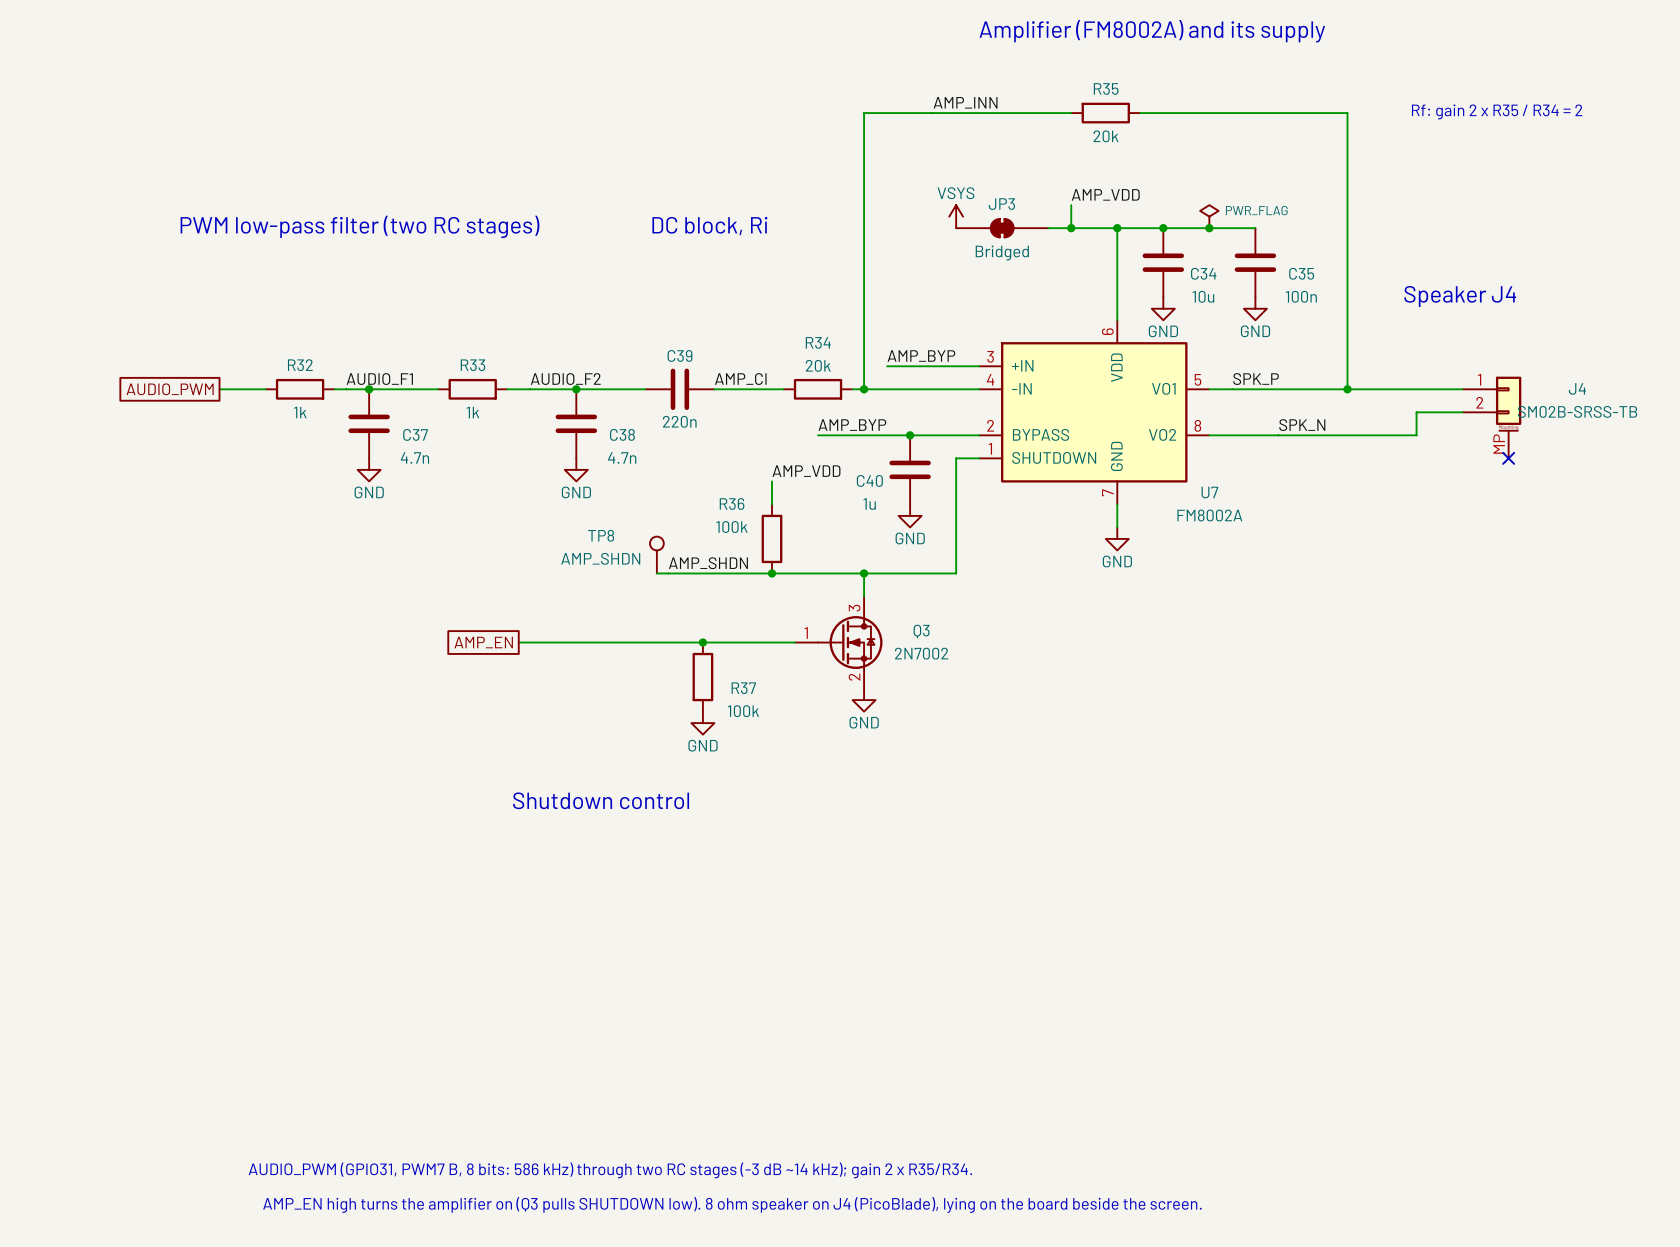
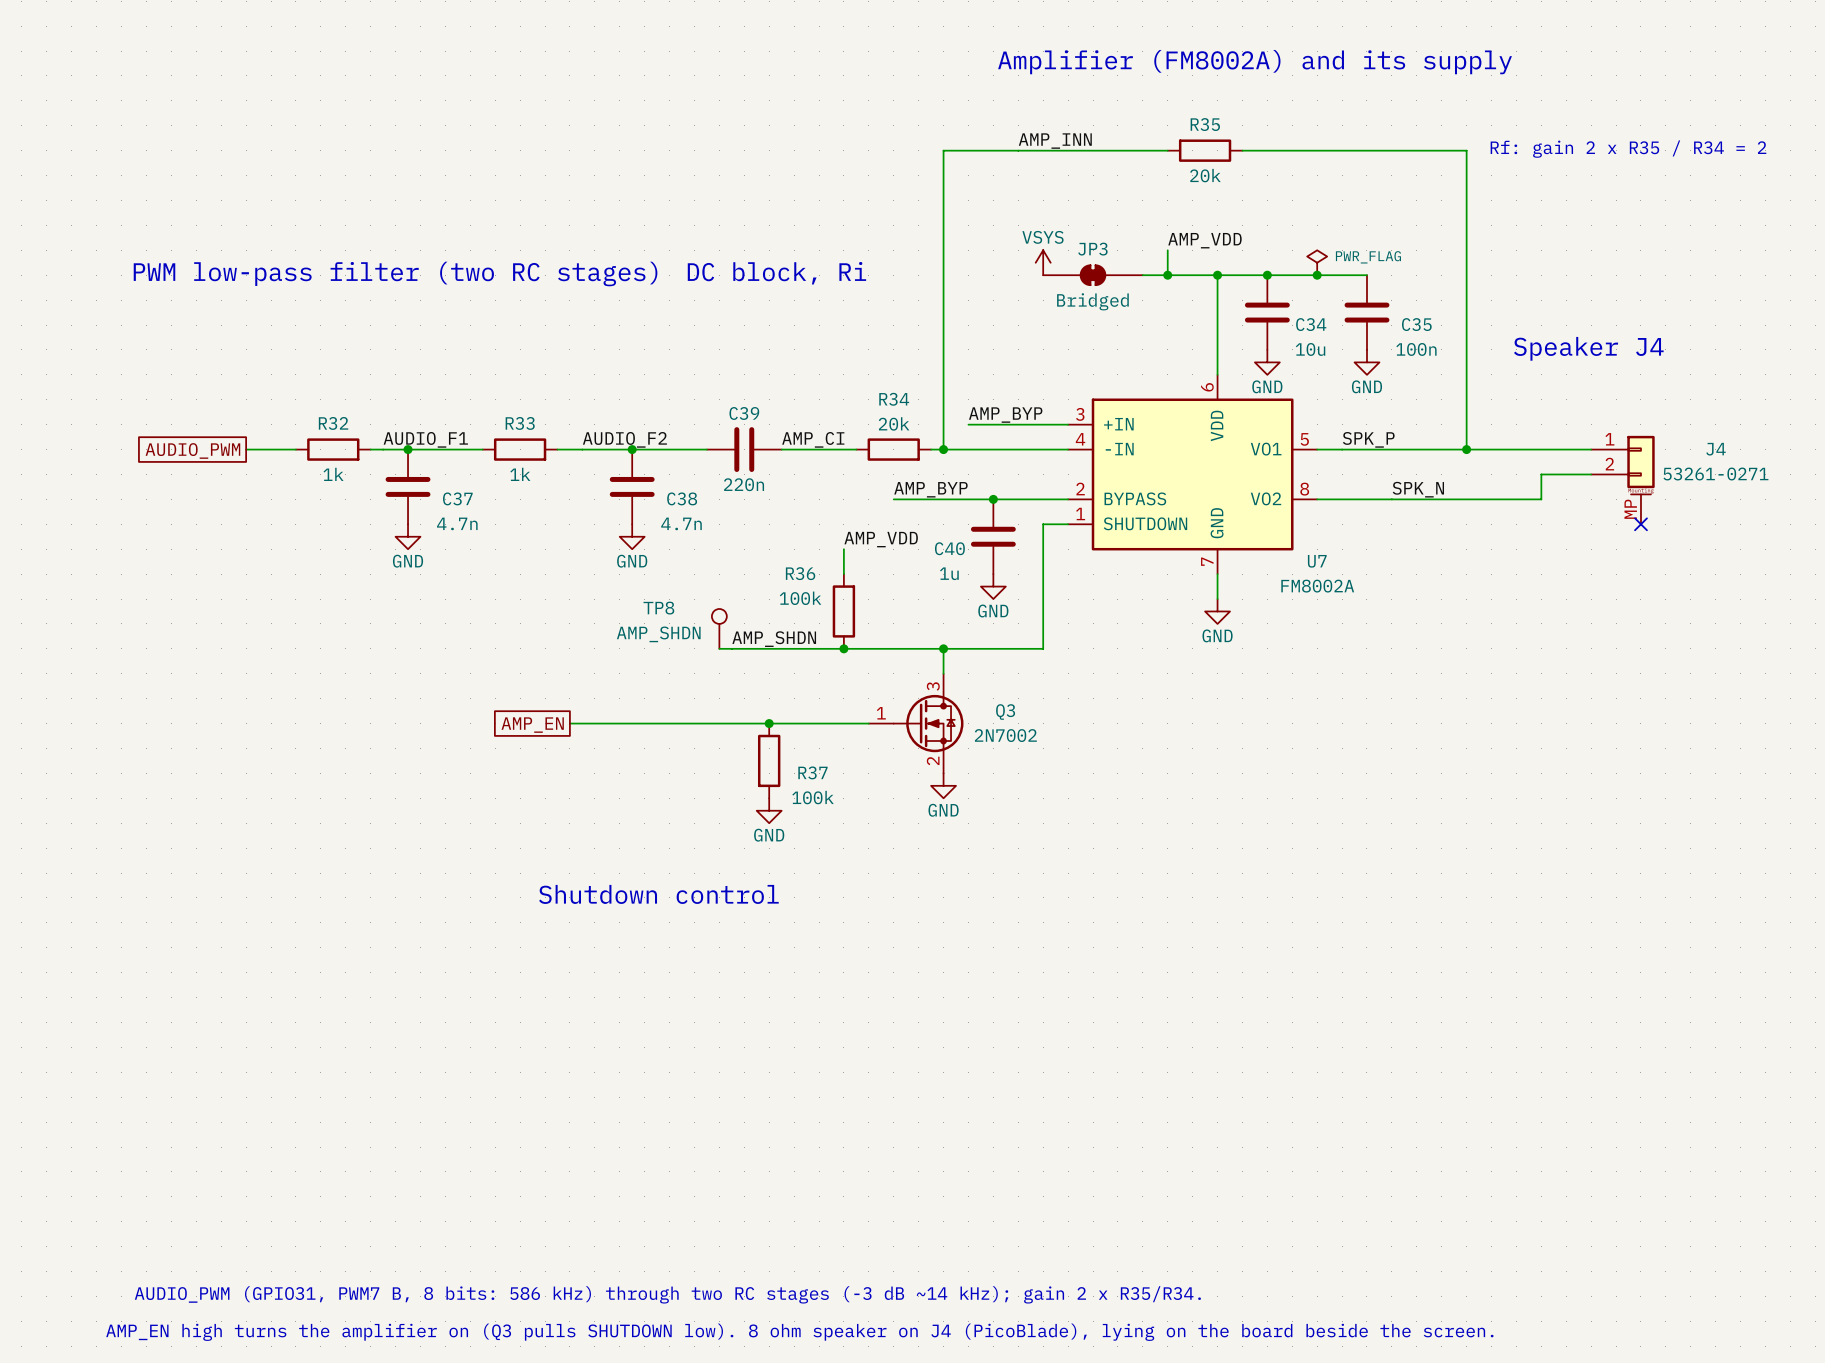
J4 value: SM02B-SRSS-TB (1577, 411) -> 53261-0271 (1715, 474)

